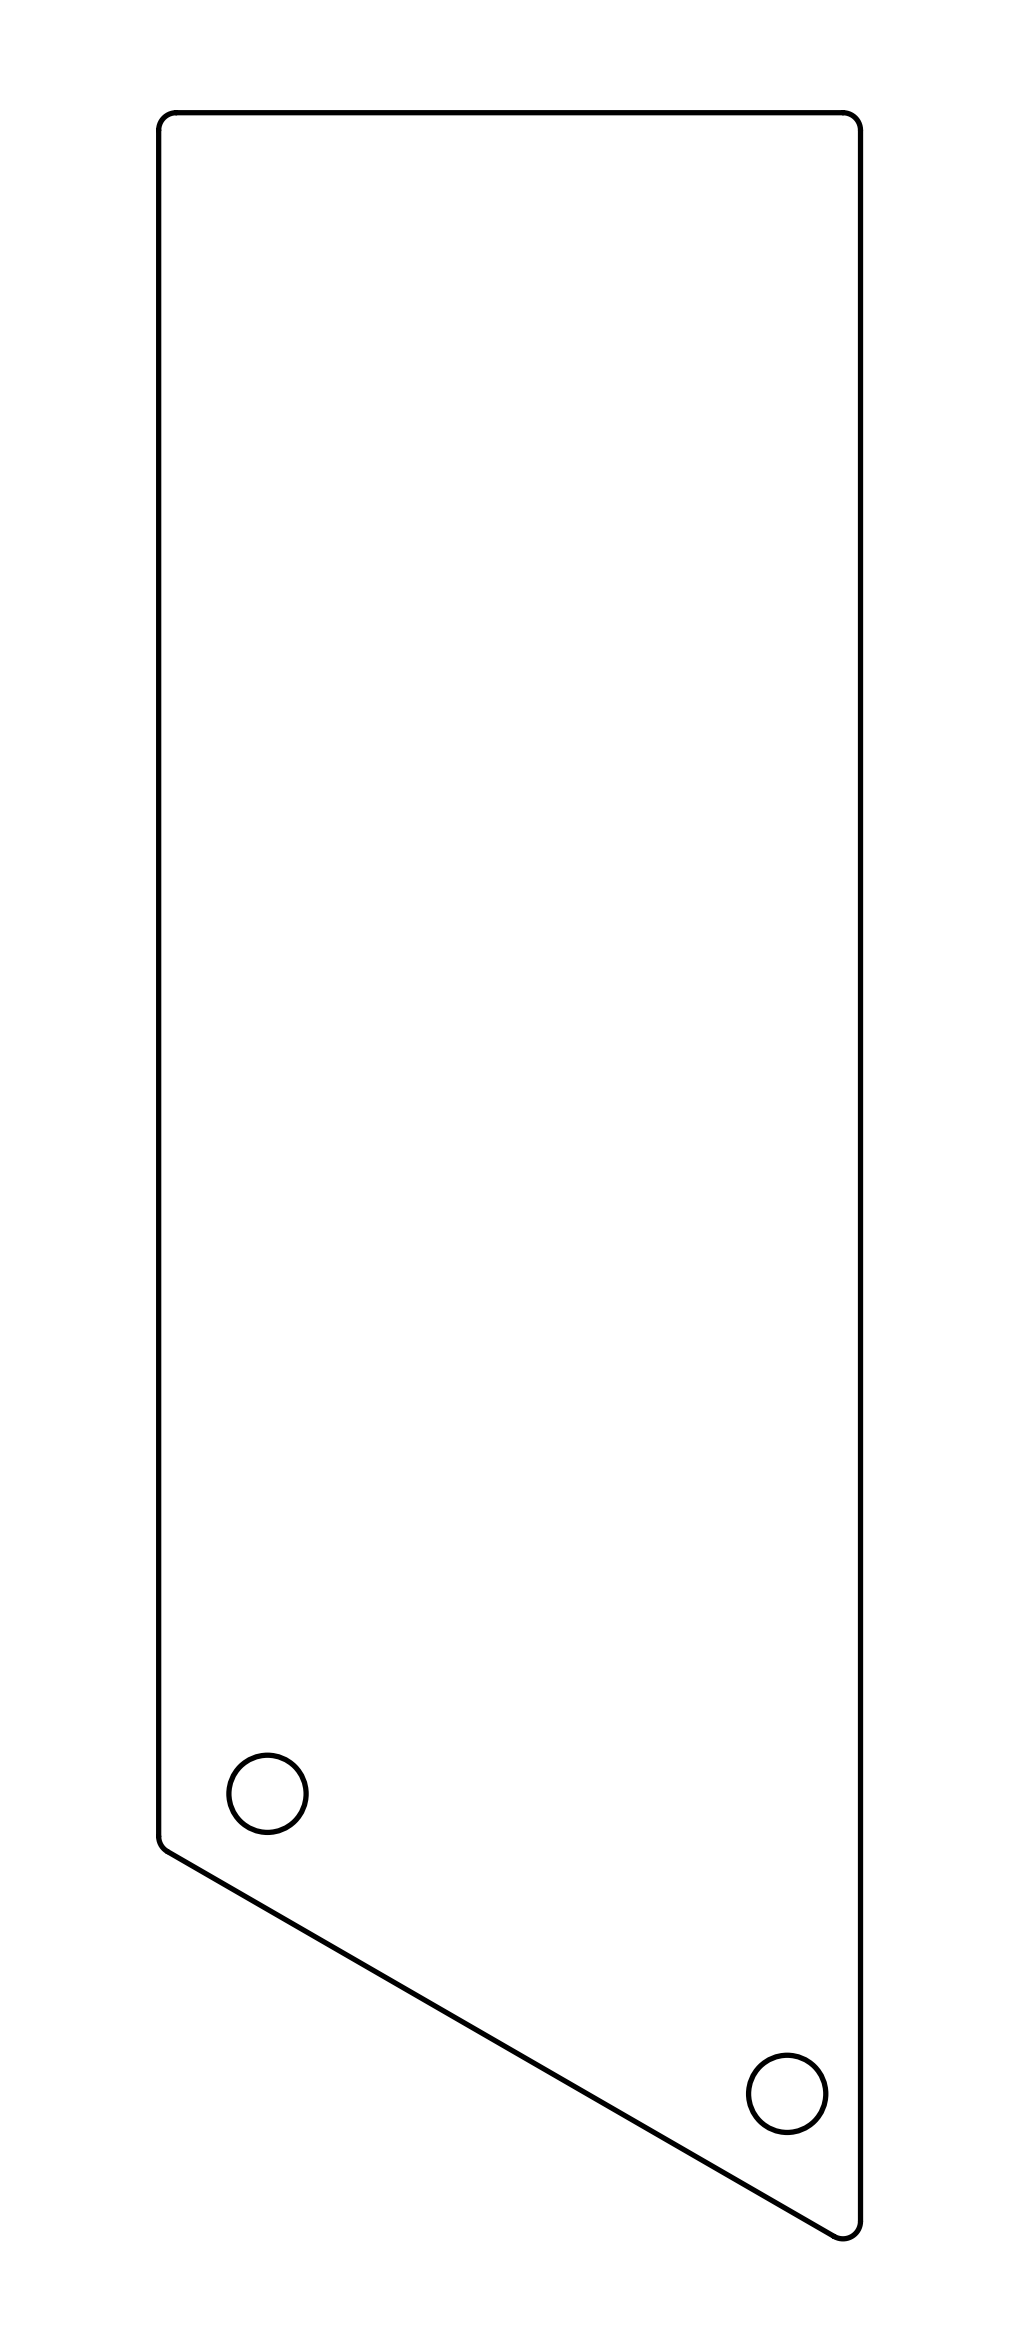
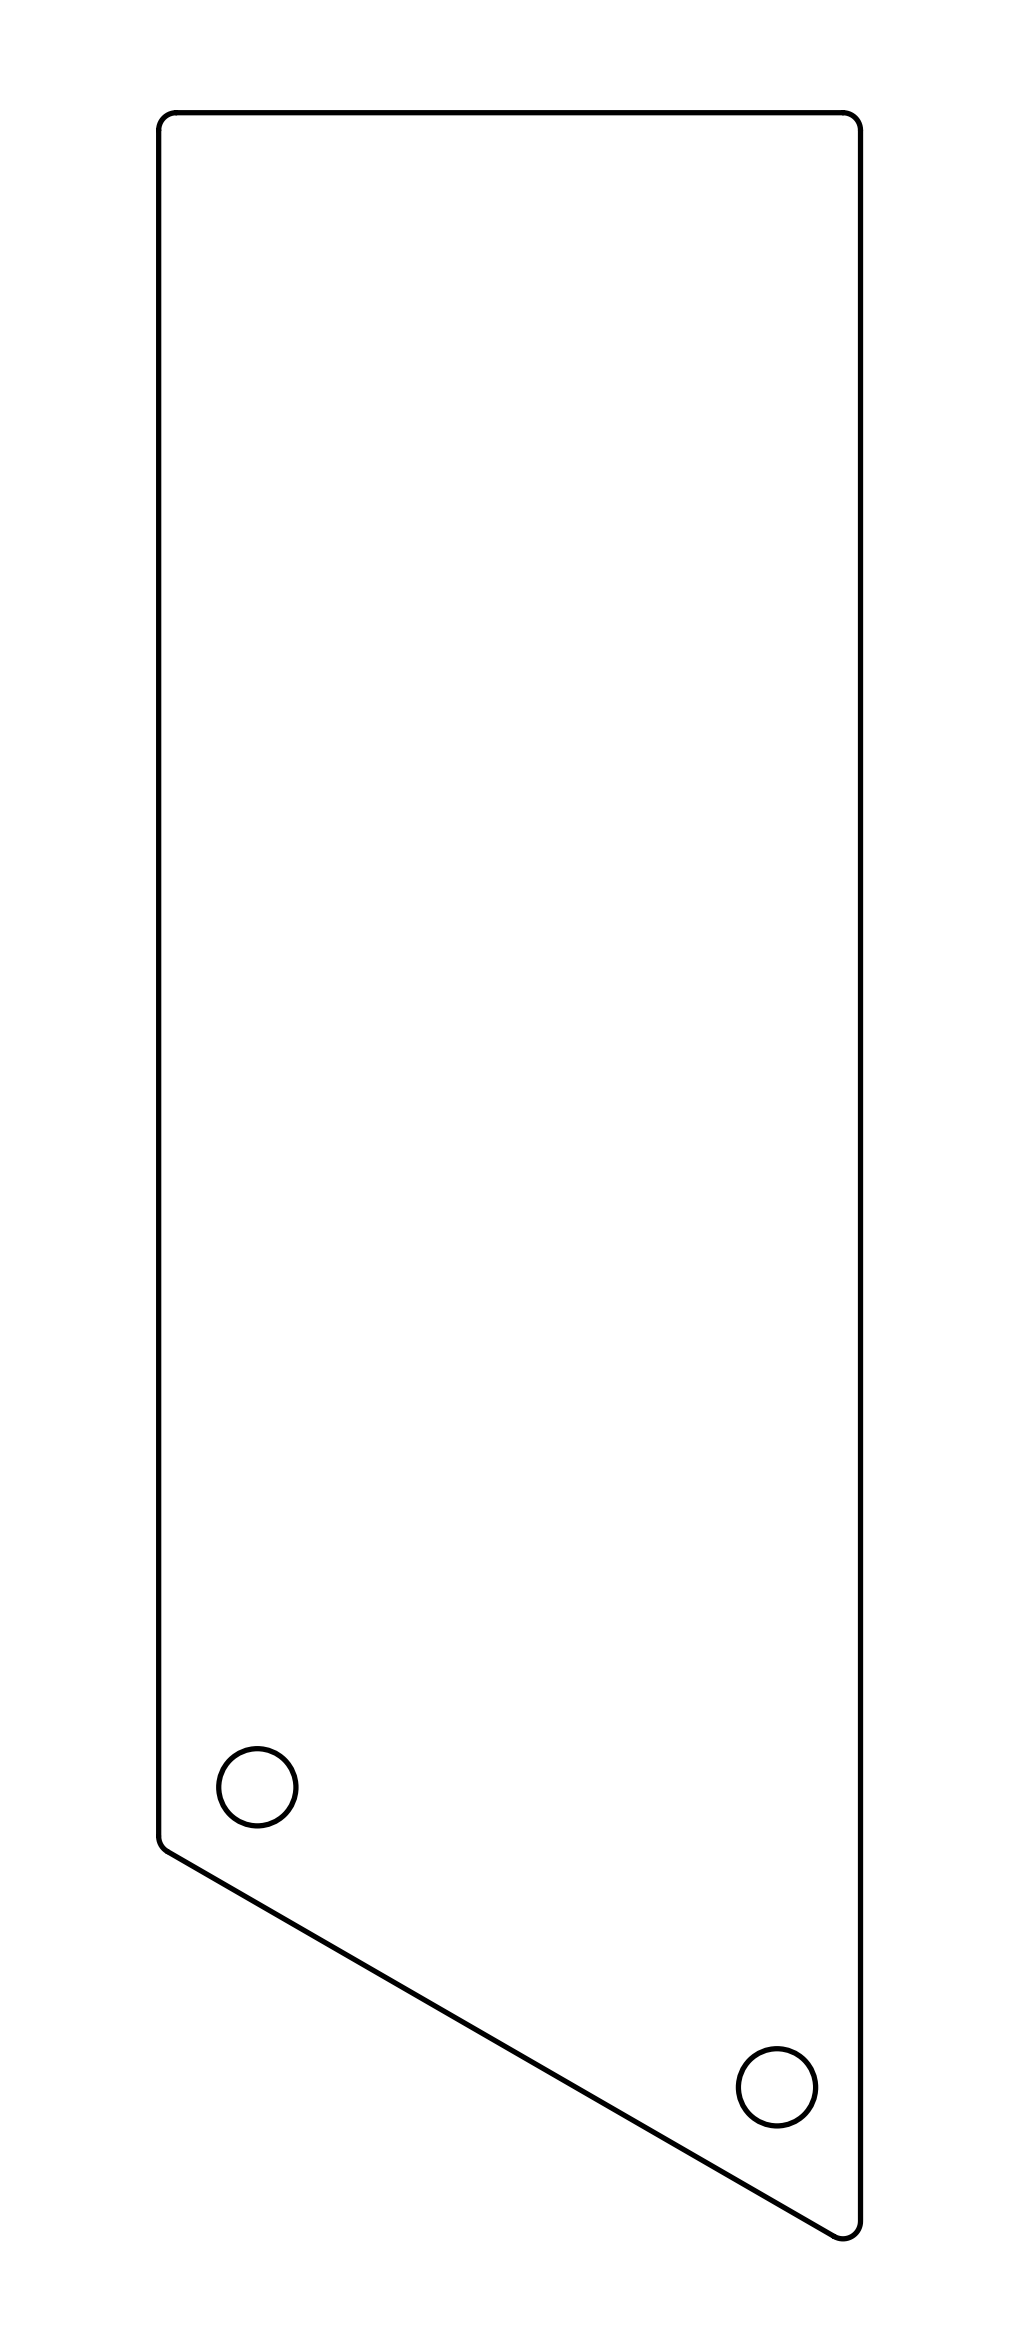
round board edge position: (267, 1793) -> (257, 1787)
round board edge position: (787, 2093) -> (777, 2087)

